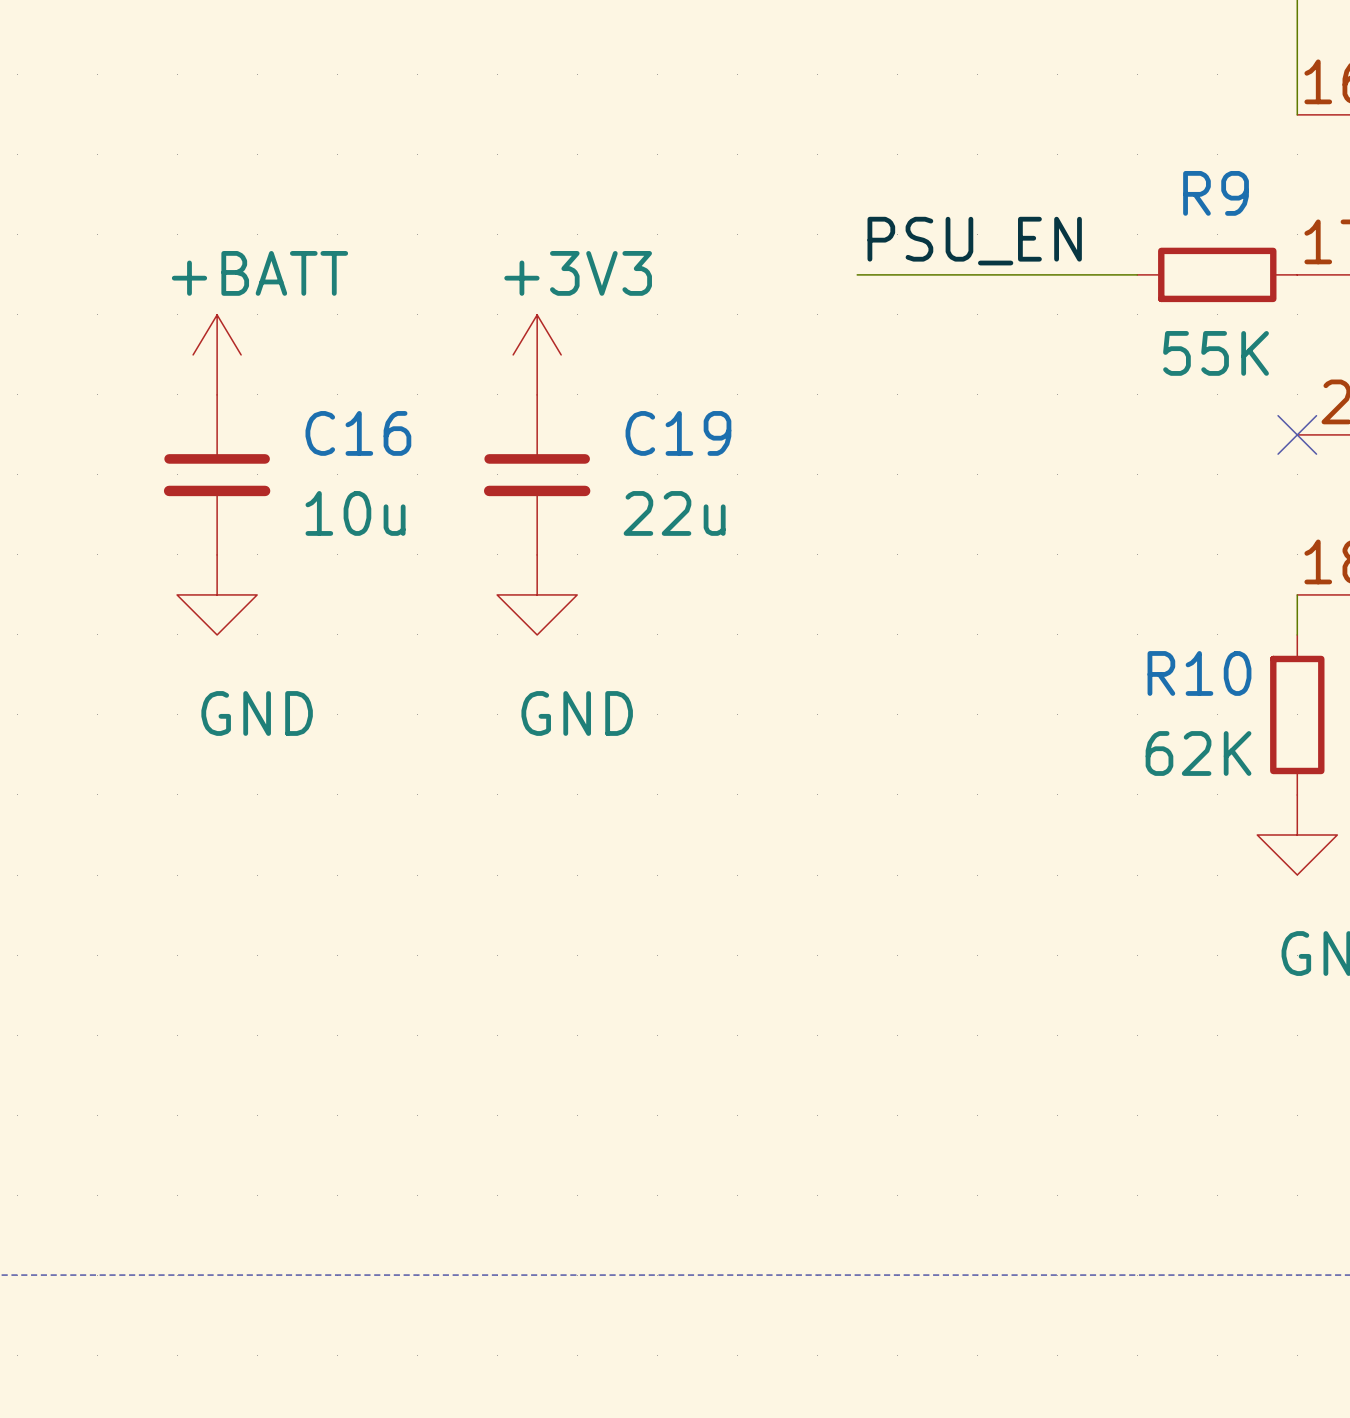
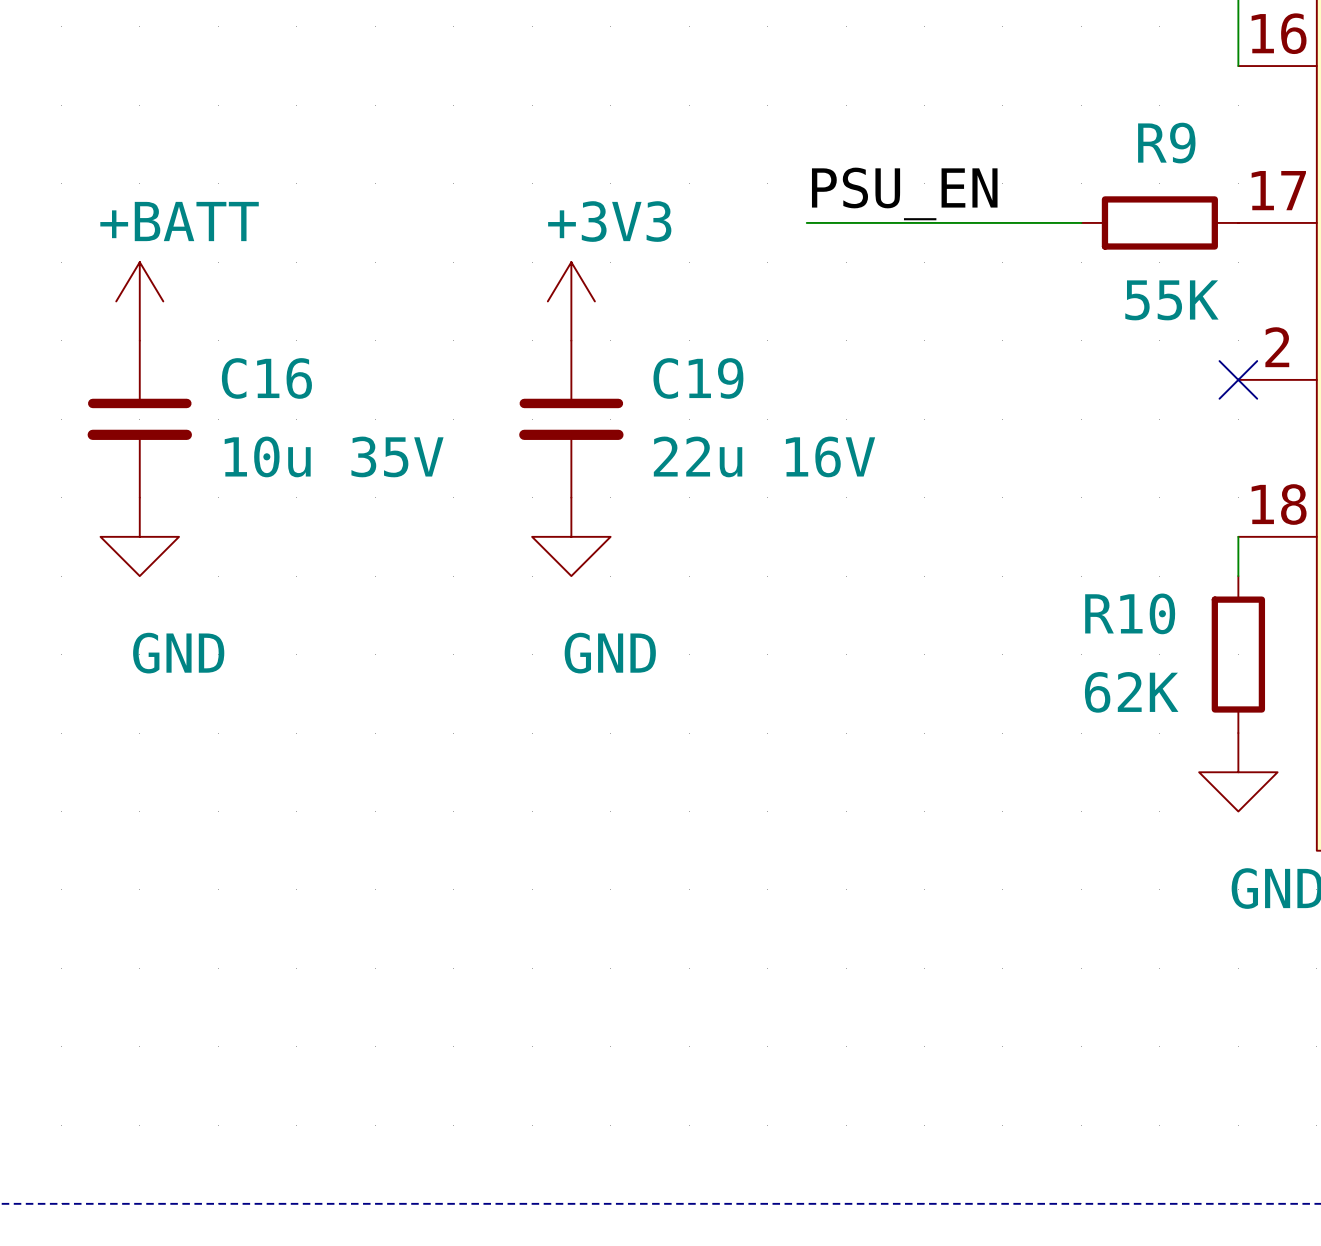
power symbol position: +BATT (217, 354) -> +BATT (139, 301)
power symbol position: +3V3 (537, 354) -> +3V3 (571, 301)
C16 position: (217, 474) -> (139, 419)
C19 position: (537, 474) -> (571, 419)
C16 value: 10u (355, 513) -> 10u 35V (334, 456)
C19 value: 22u (674, 513) -> 22u 16V (764, 456)
power symbol position: GND (217, 594) -> GND (139, 536)
power symbol position: GND (537, 594) -> GND (571, 536)

